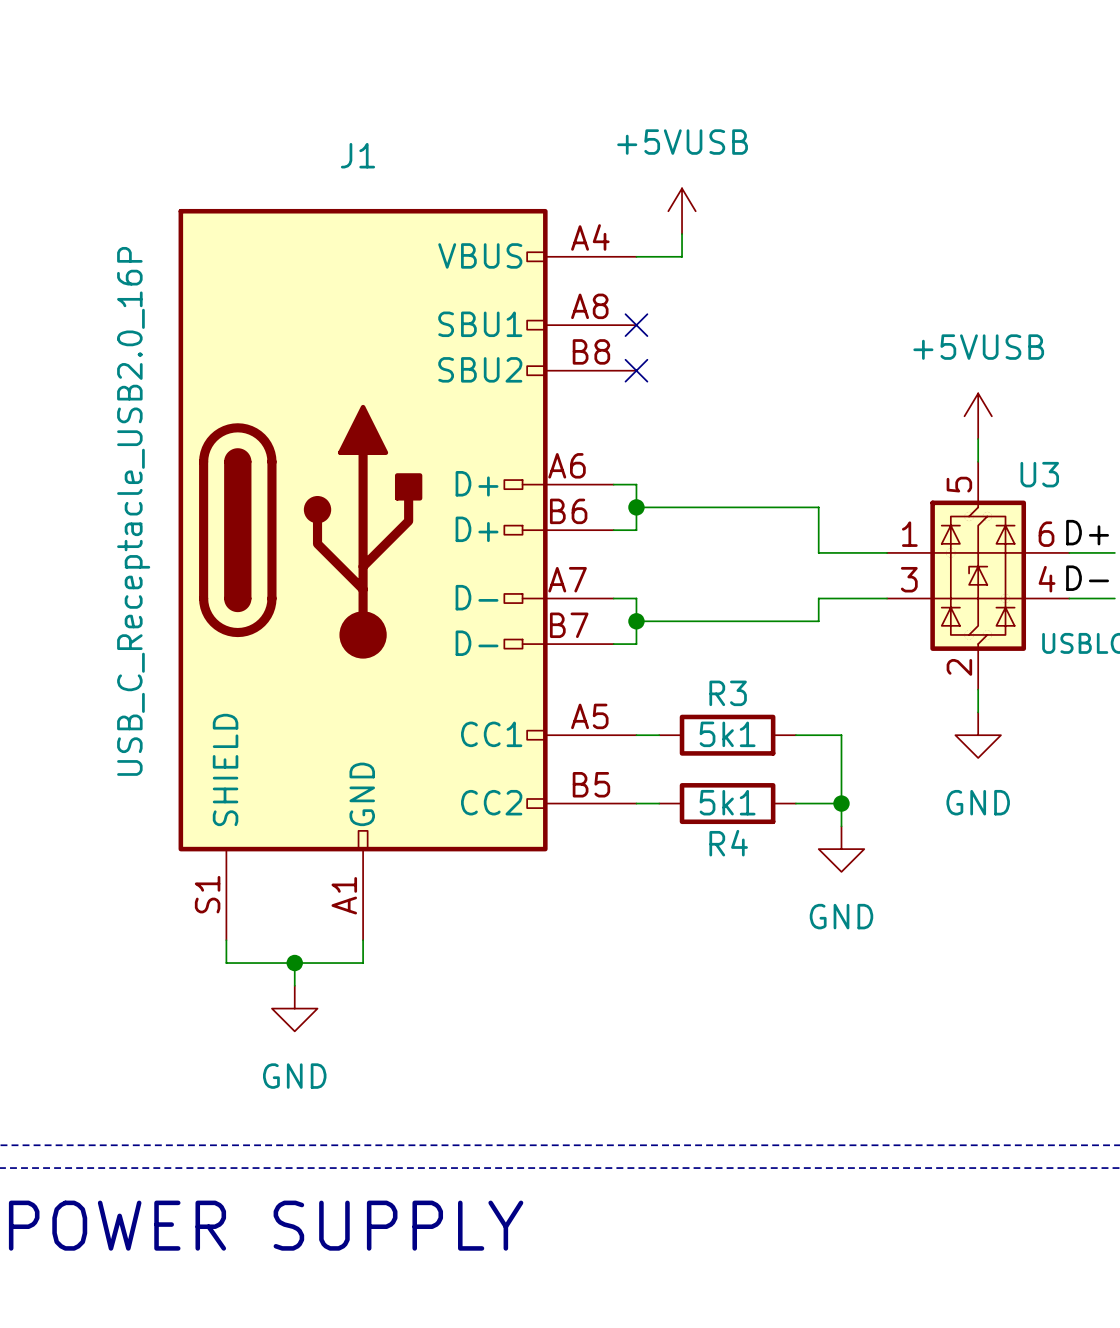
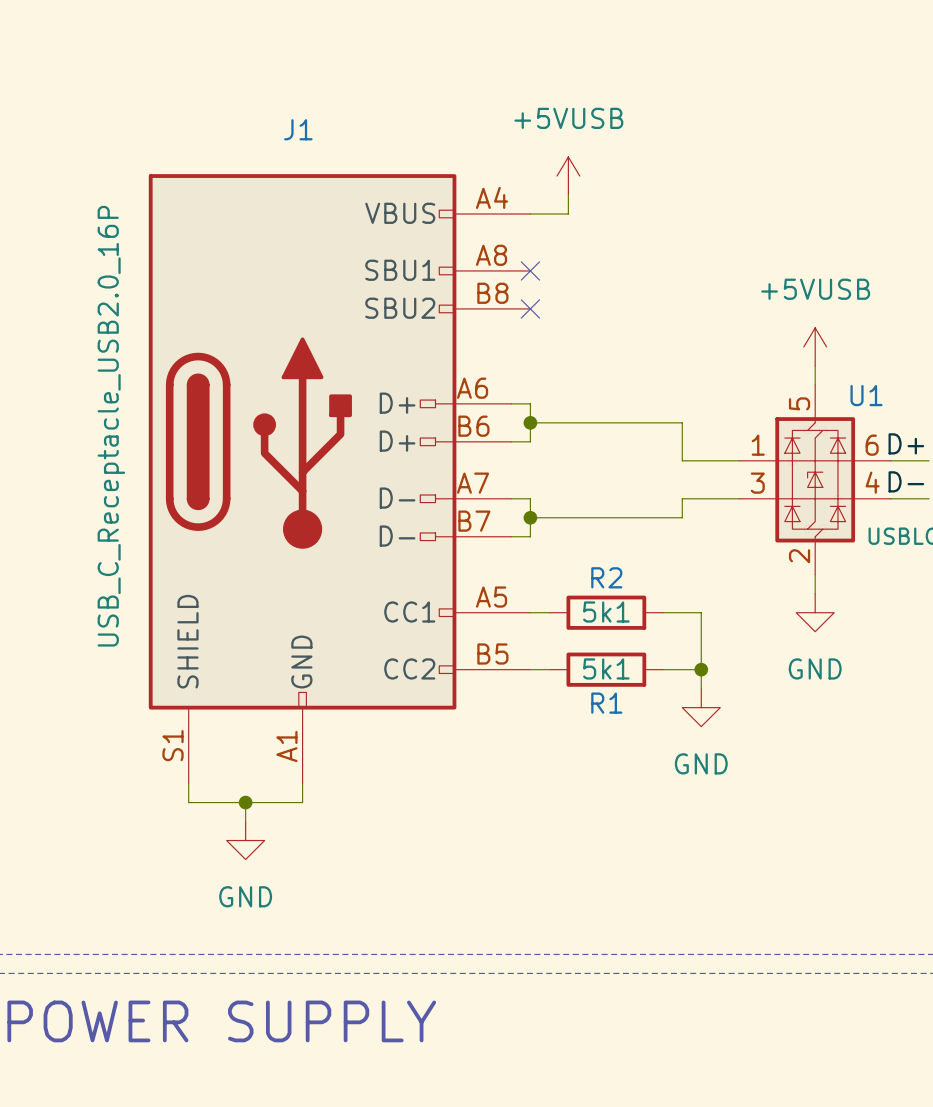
U3 name: U3 (1039, 474) -> U1 (866, 395)
R3 name: R3 (728, 693) -> R2 (606, 577)
R4 name: R4 (728, 843) -> R1 (606, 703)

